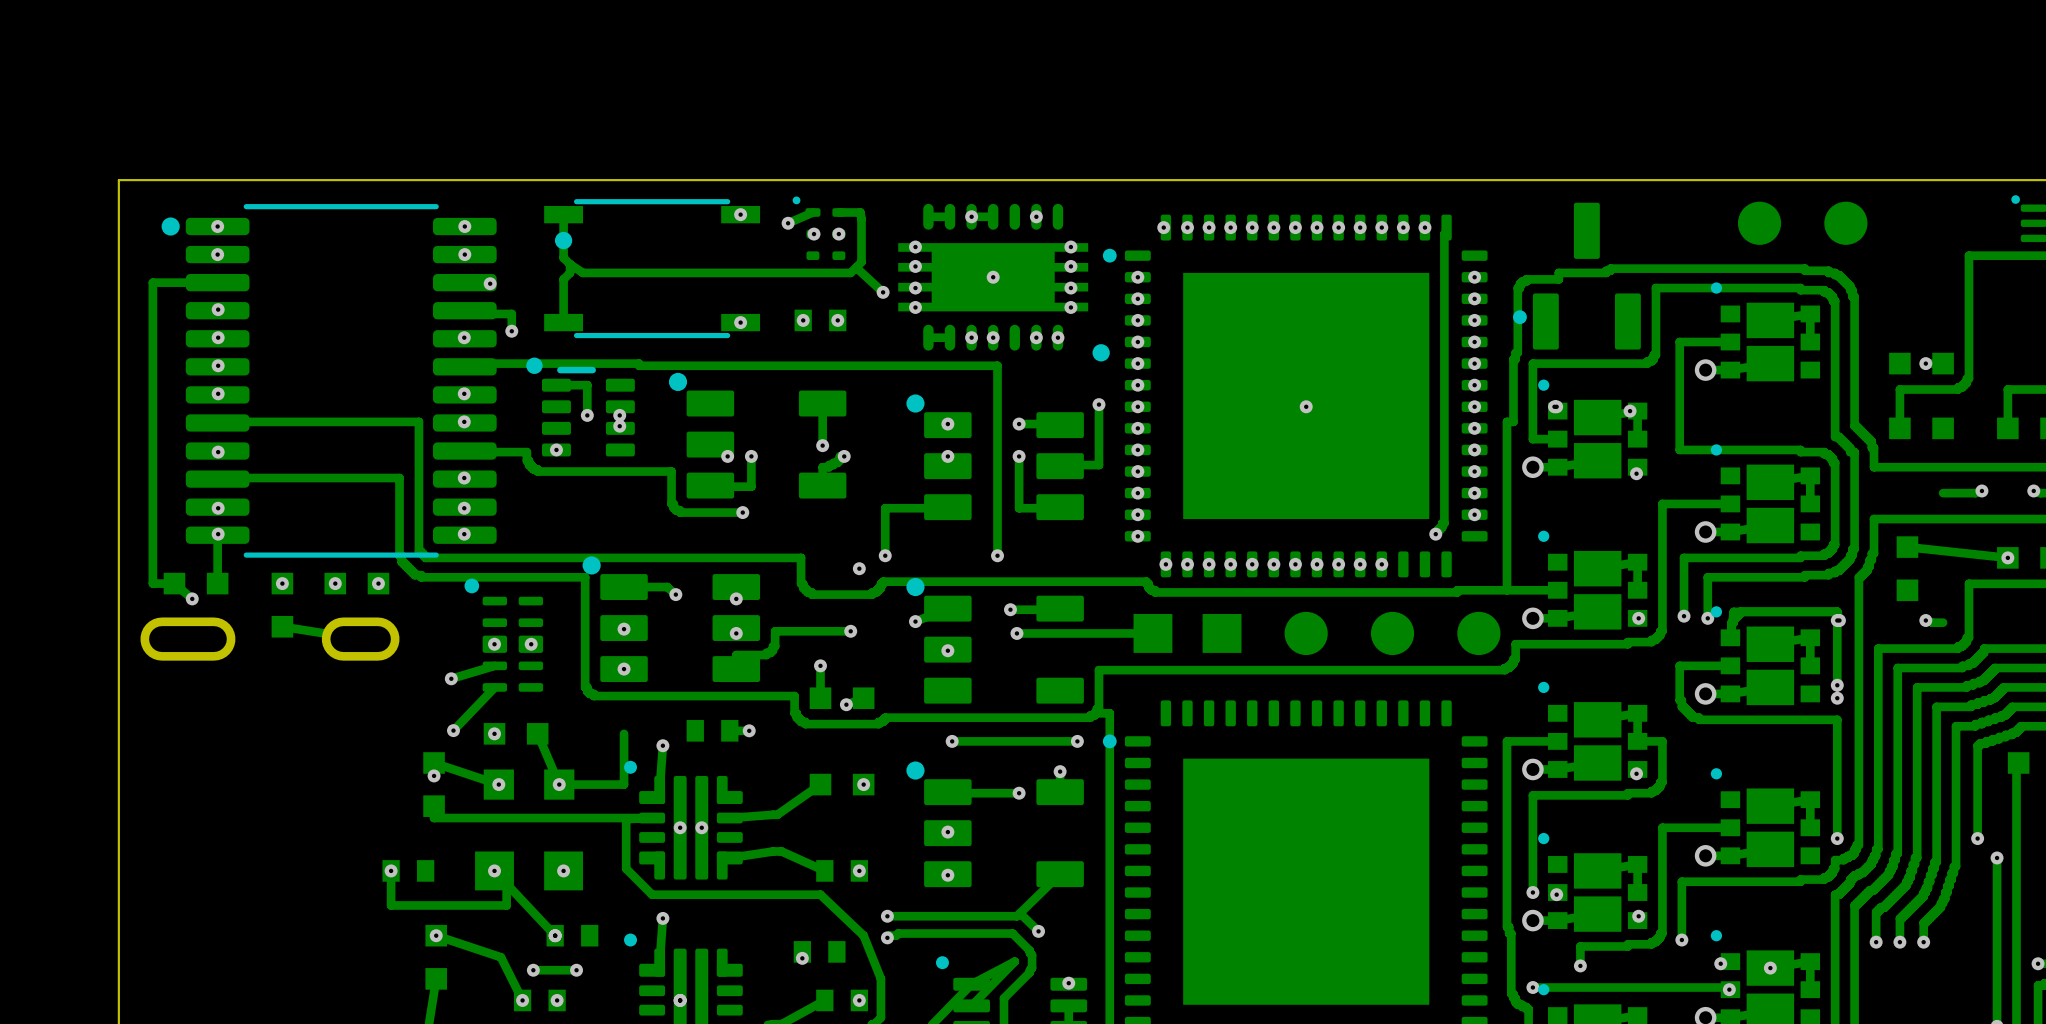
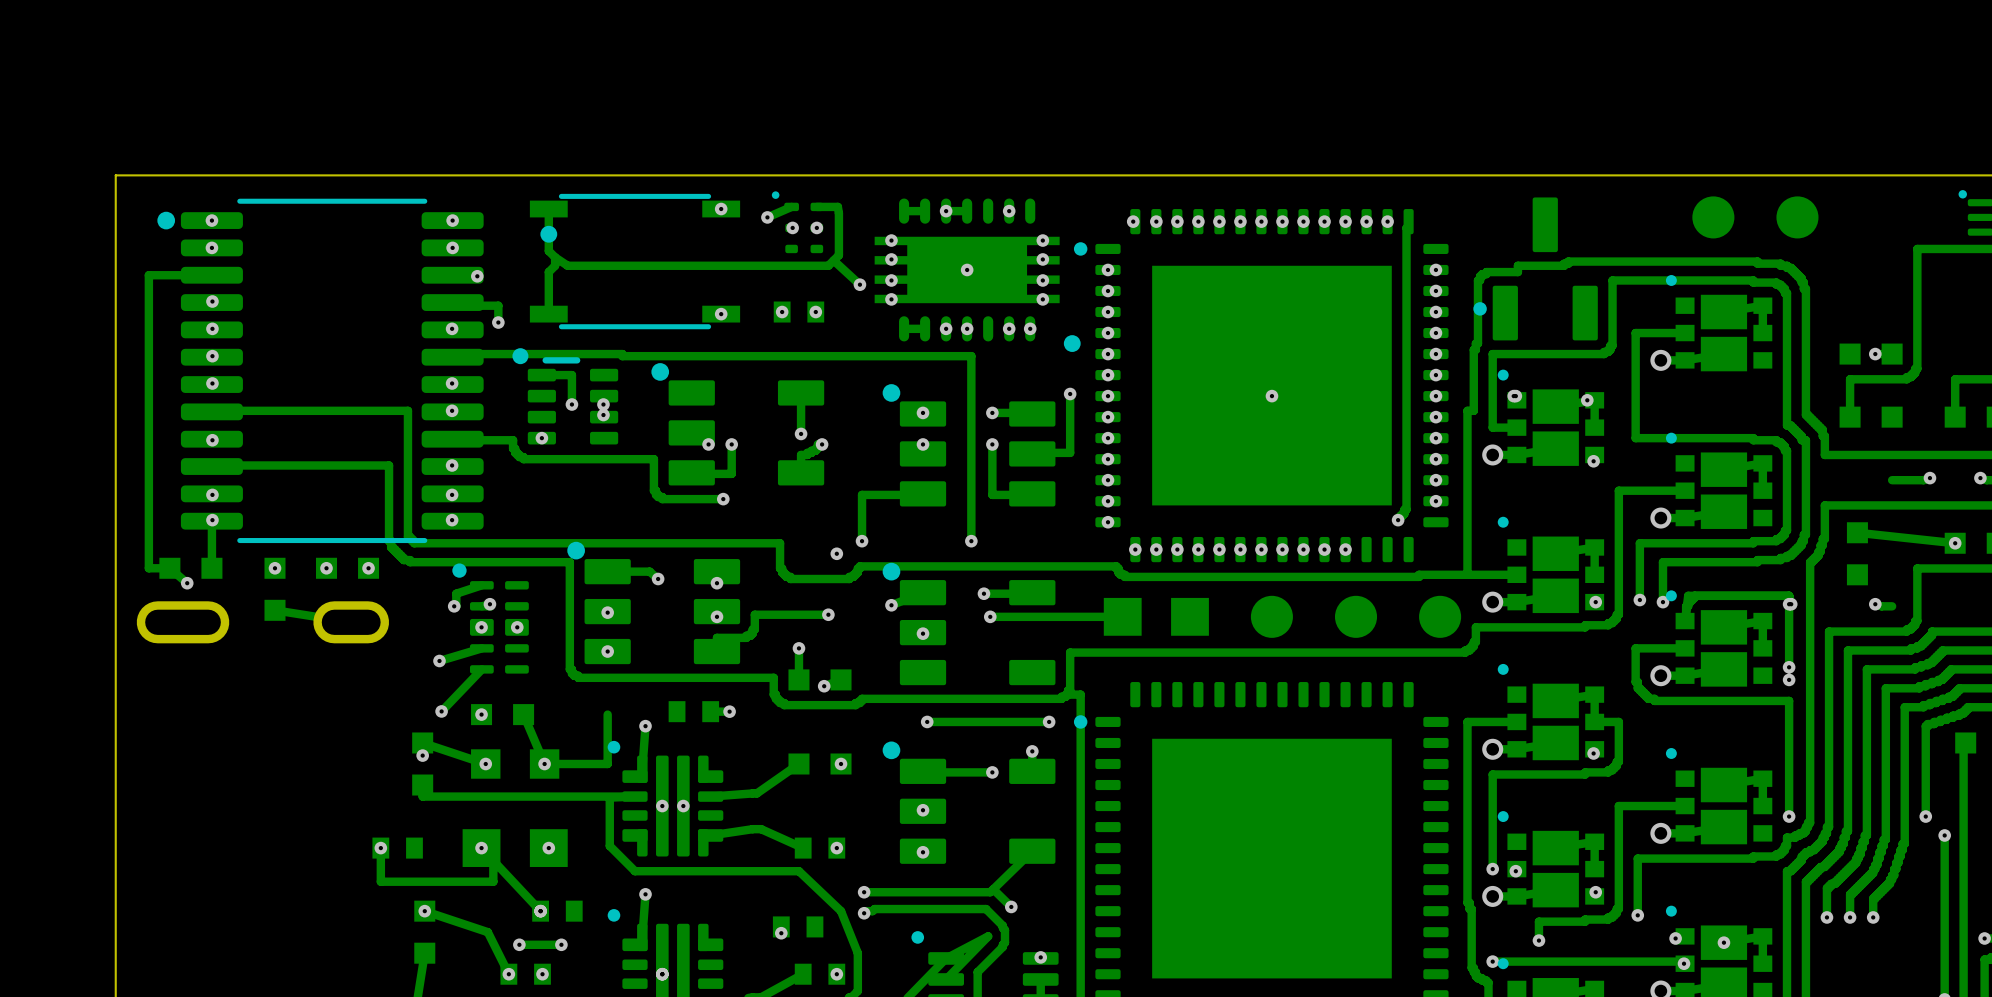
track: none -> (481, 585) (456, 593) (456, 606) (454, 606)
via: none -> (489, 604)
via: none -> (454, 606)

